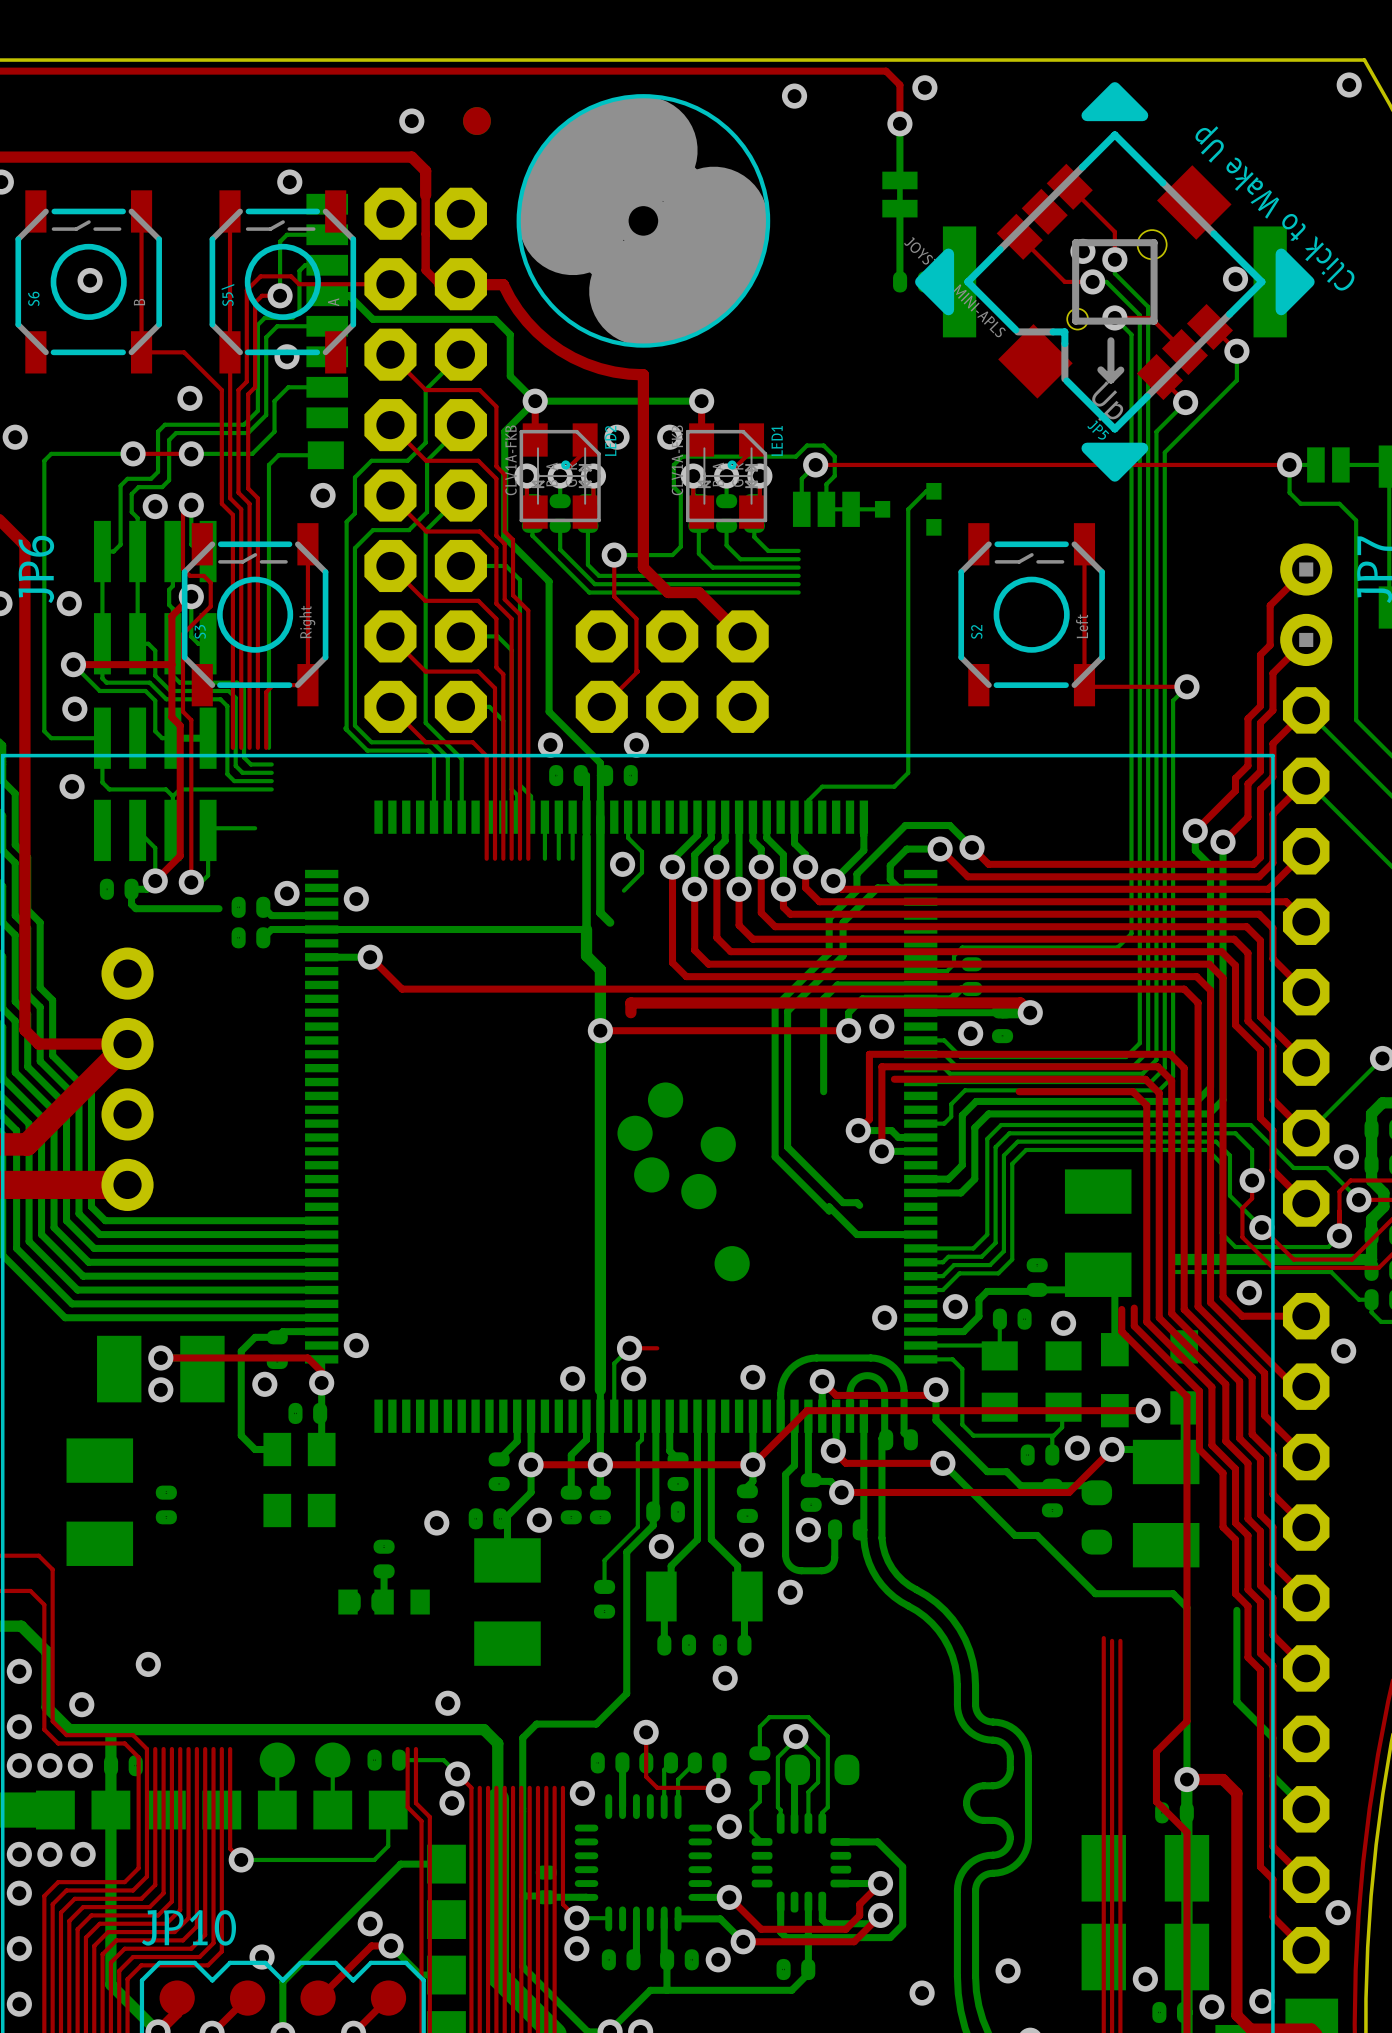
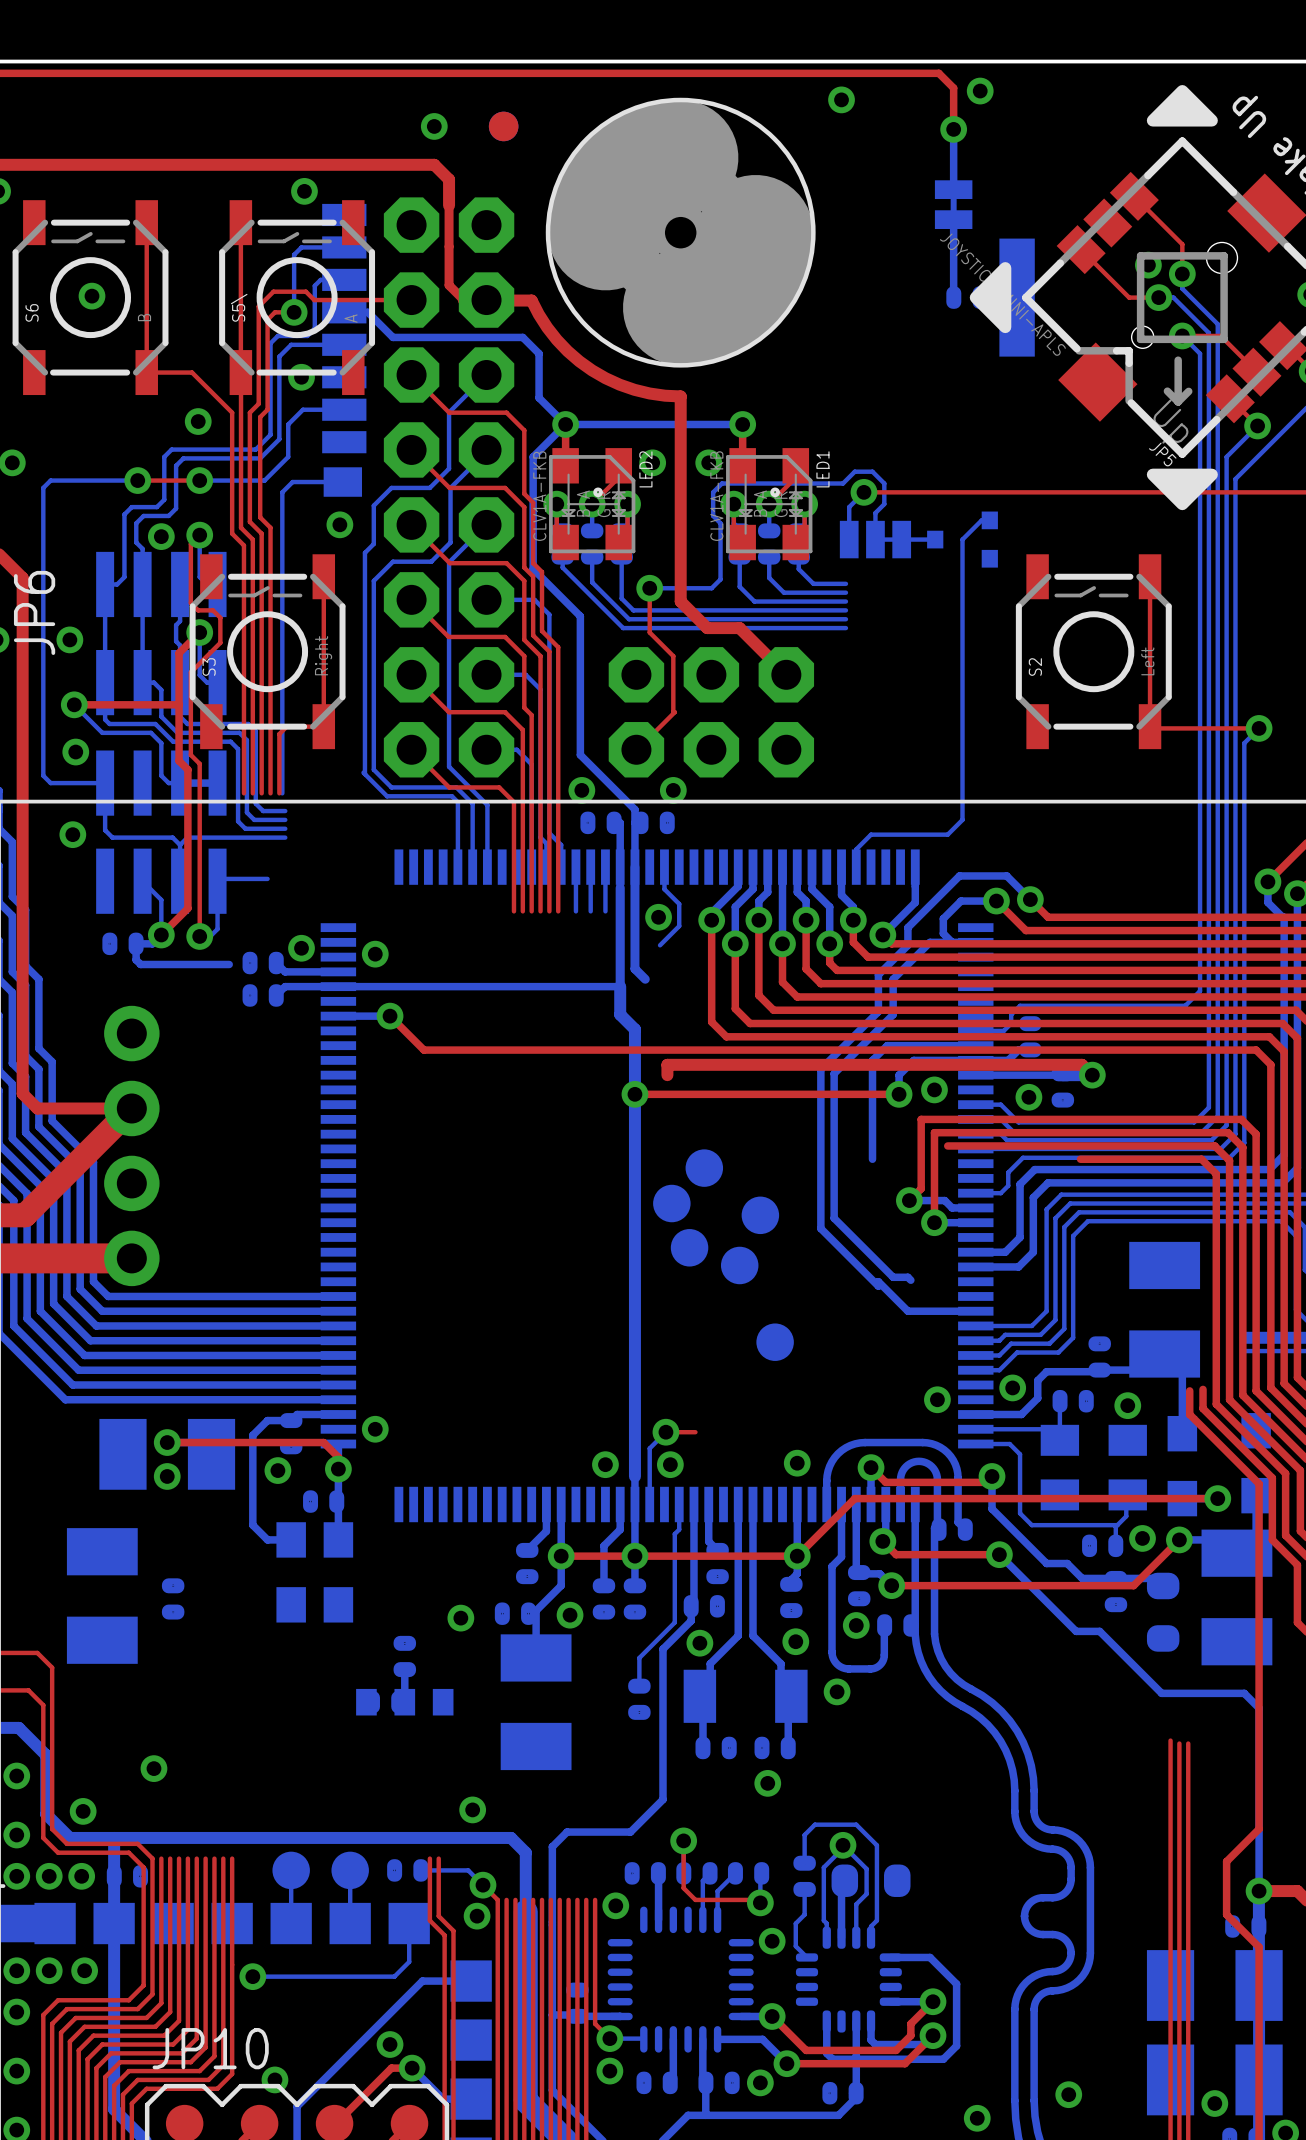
top track: (230, 1749) (230, 1848) (241, 1859) -> none

